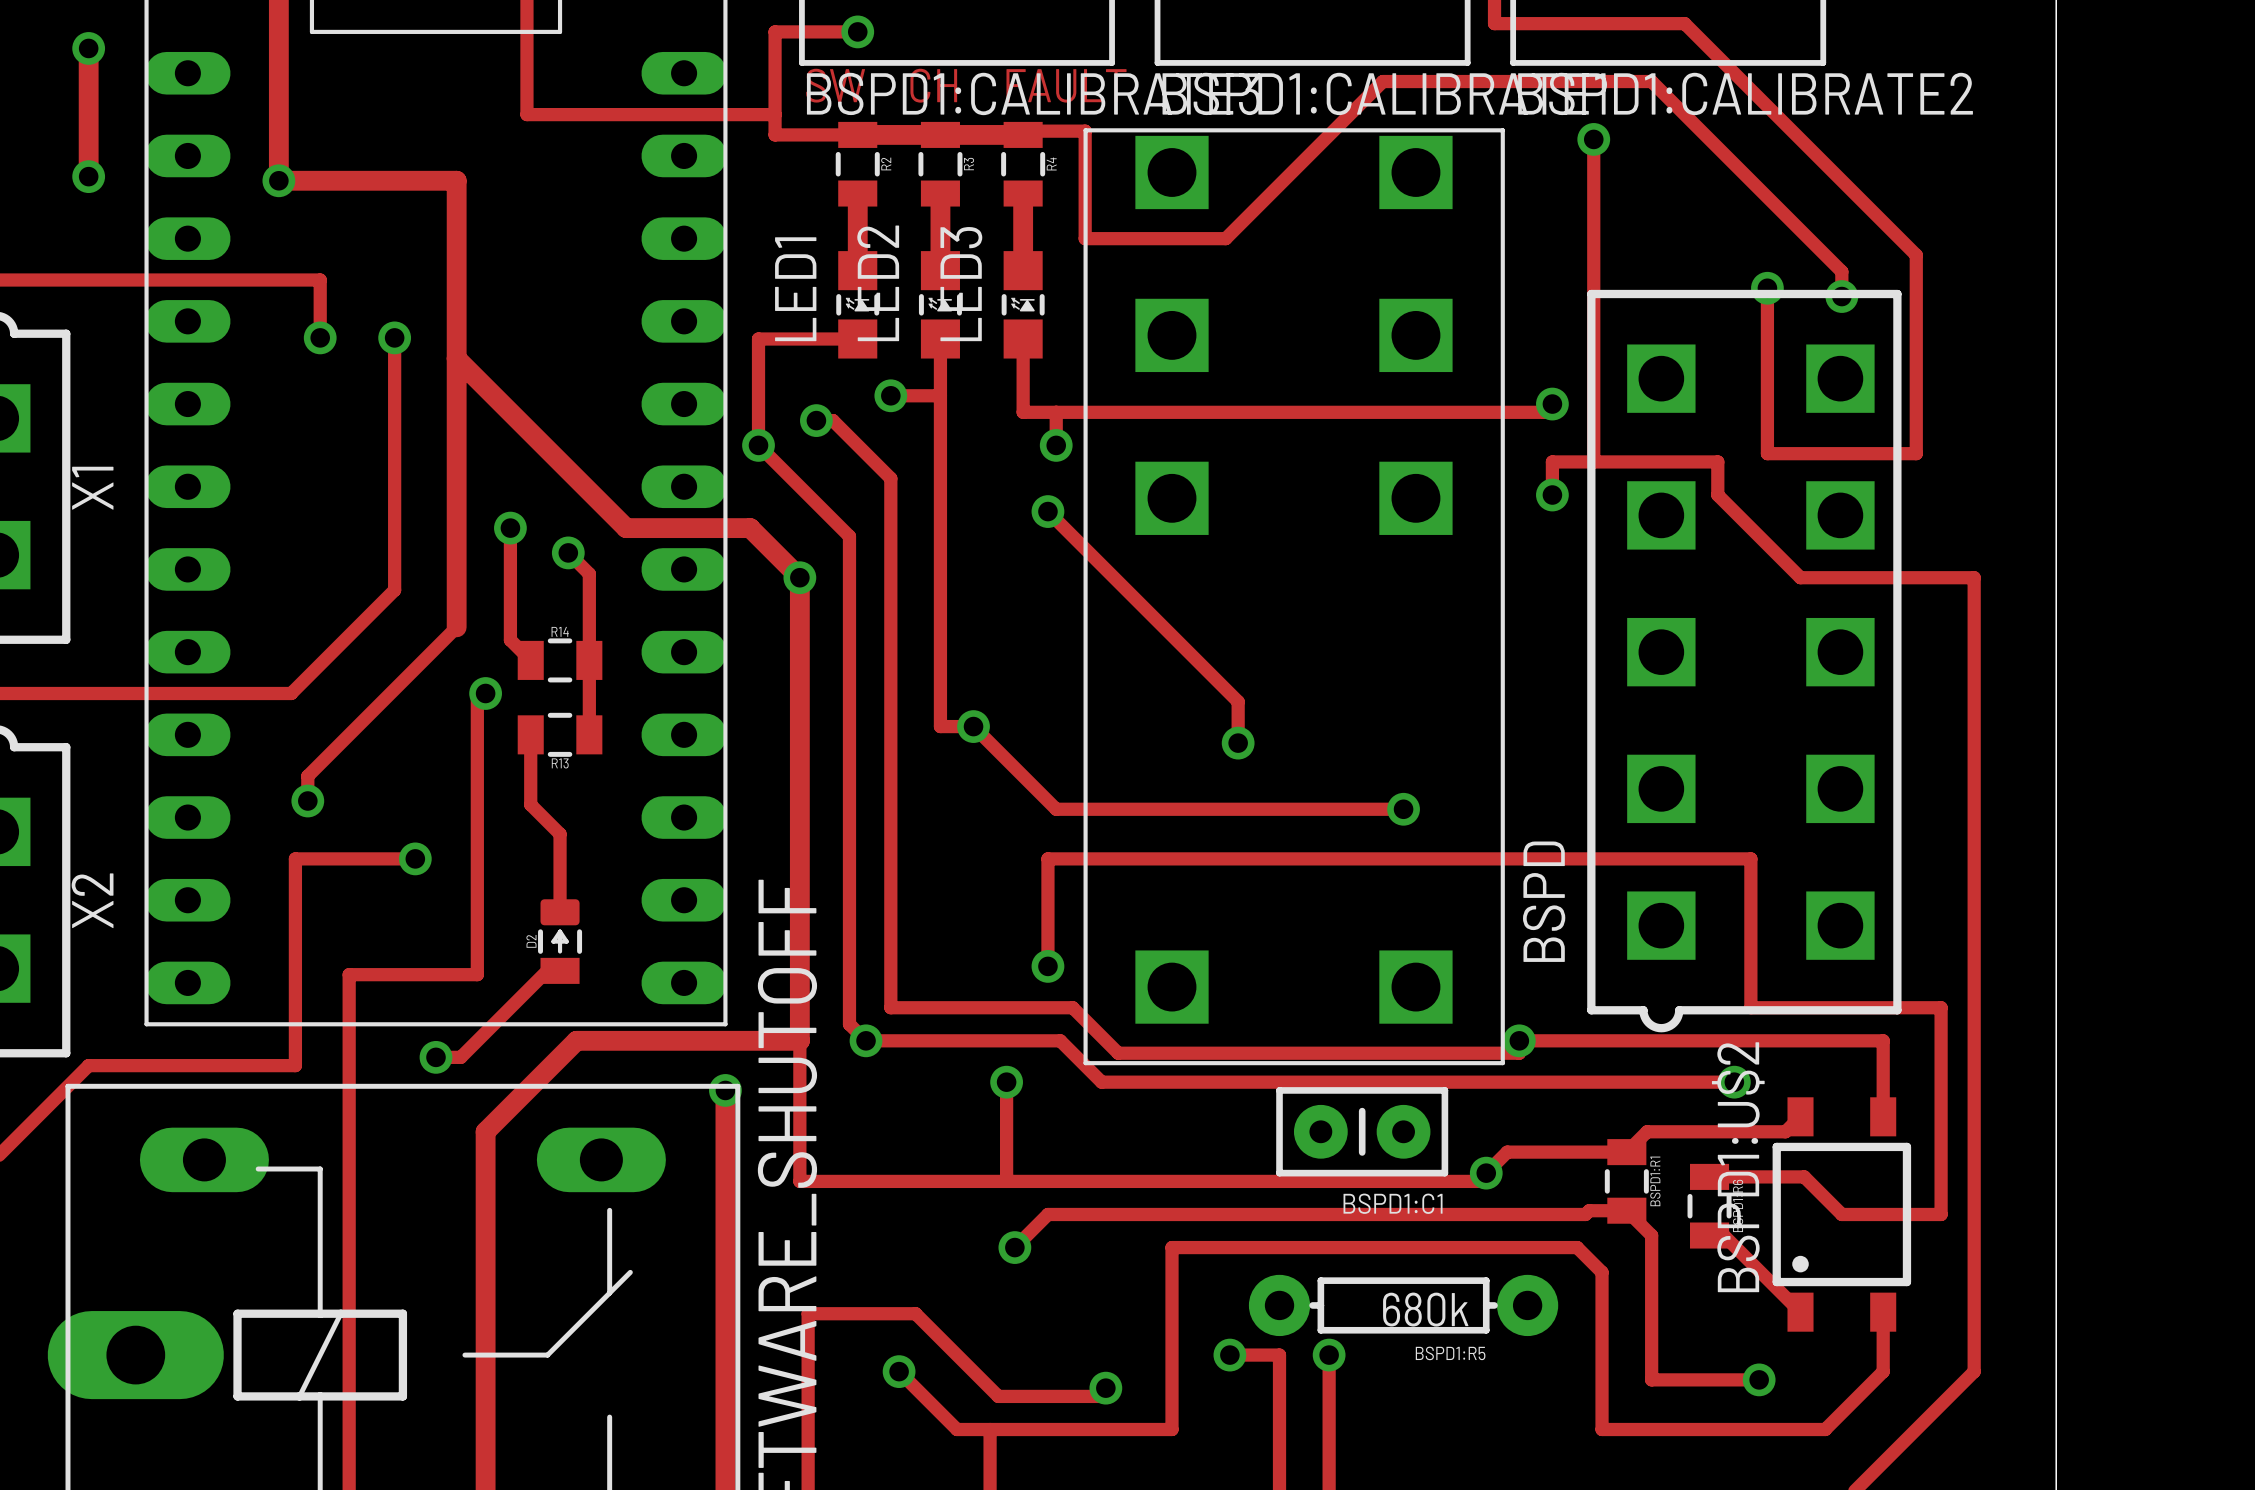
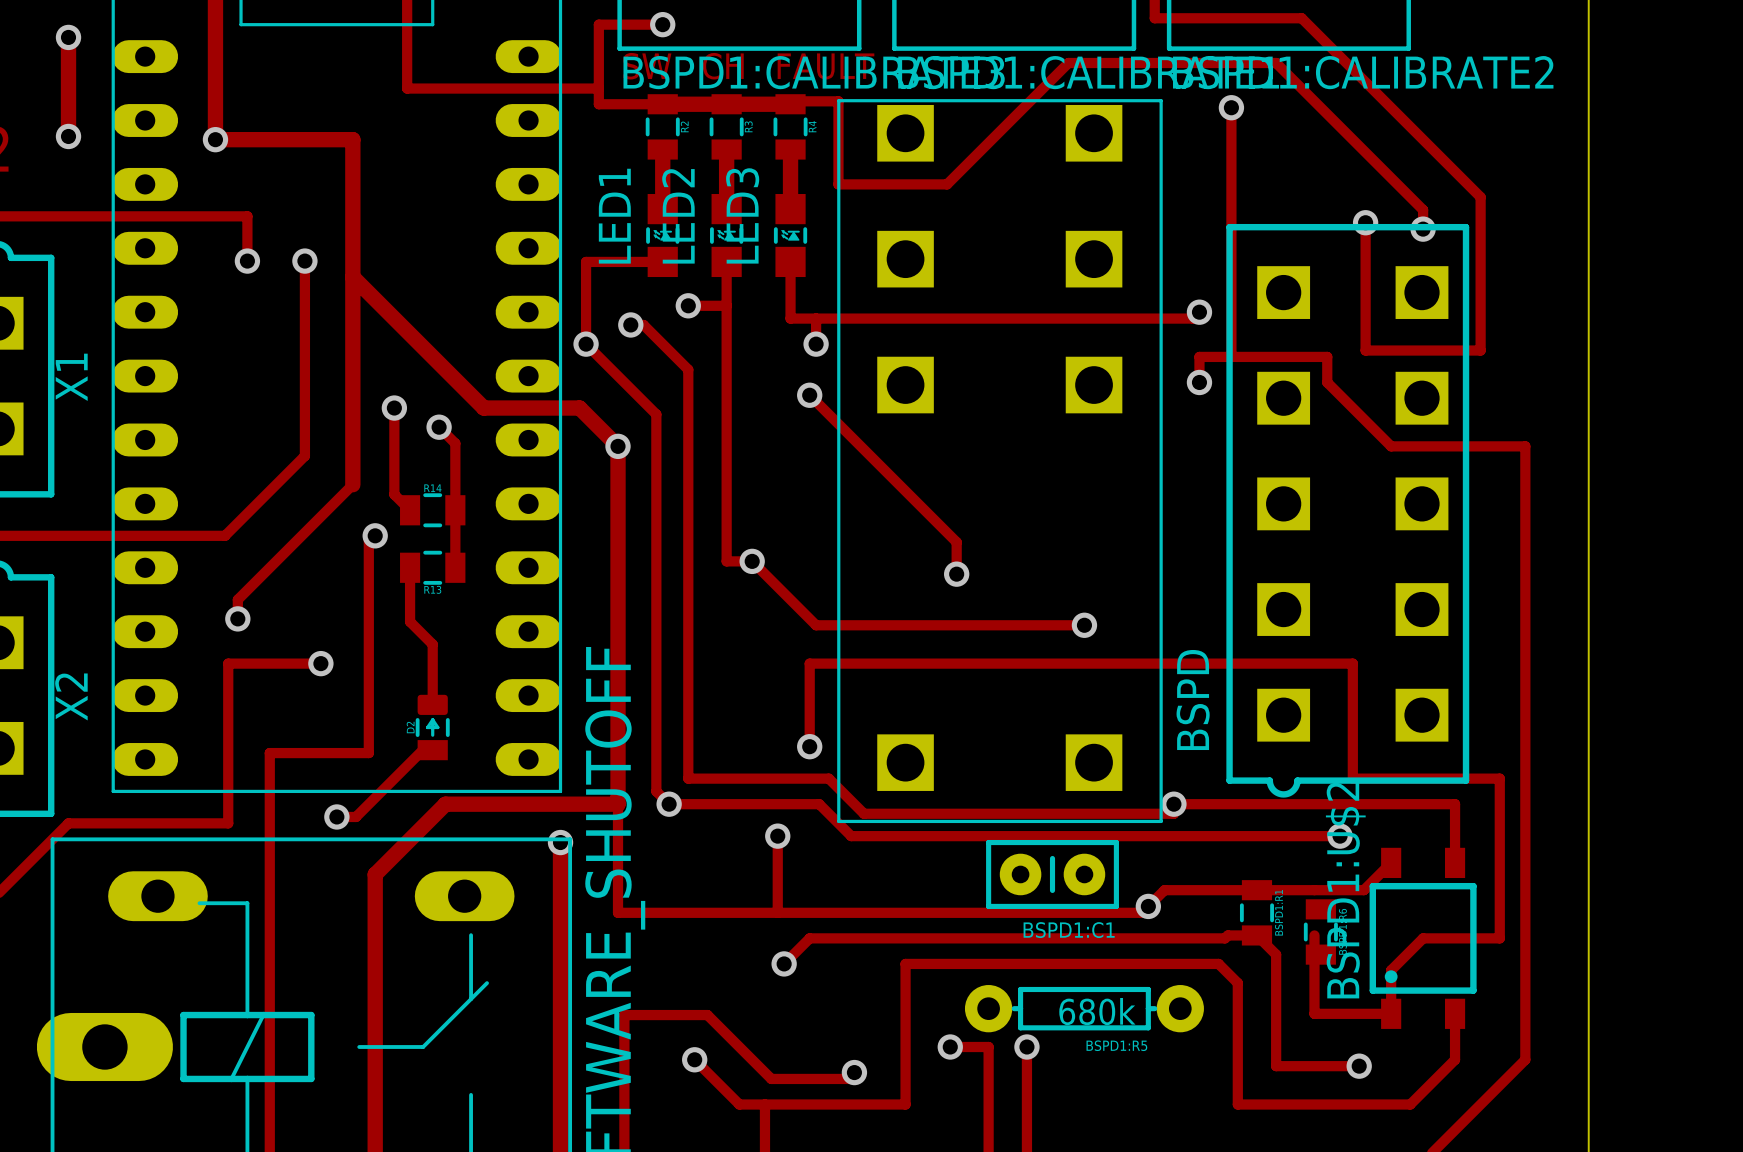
track: (1785, 1131) (1647, 1131) (1626, 1152) -> (1379, 874) (1363, 890) (1256, 890)
track: (1709, 1176) (1804, 1176) (1841, 1214) -> (1314, 935) (1314, 1013) (1391, 1013) (1391, 970) (1423, 938)
track: (1709, 1235) (1723, 1235) (1800, 1312) -> none

